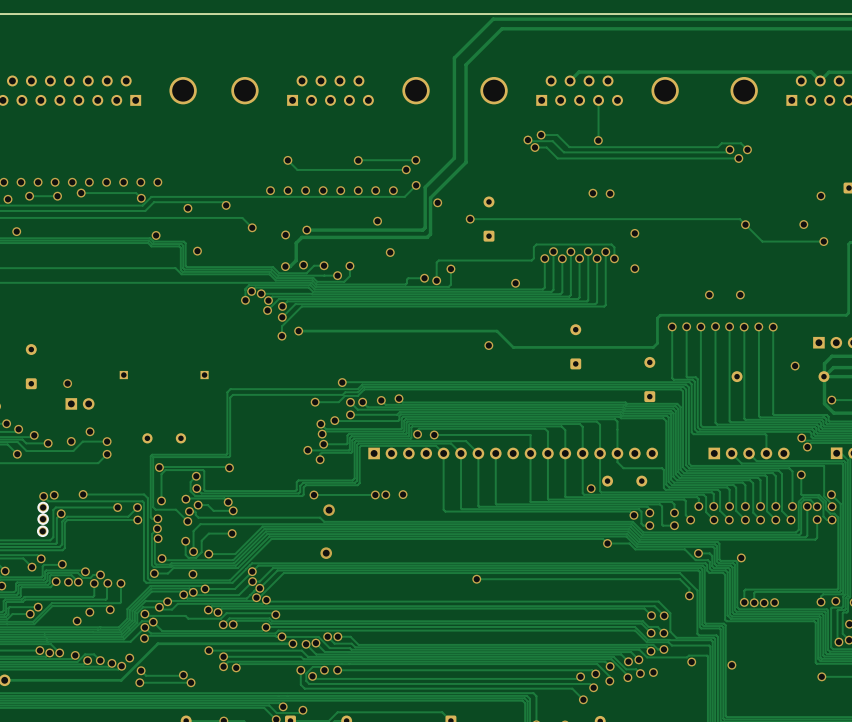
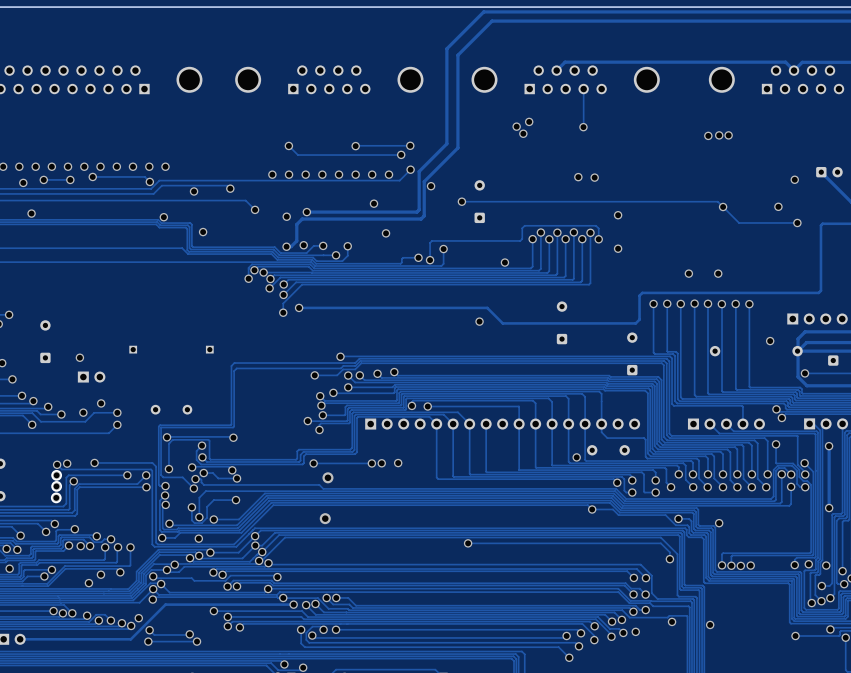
track: (541, 135) (557, 135) (569, 147) (717, 147) (721, 143) (741, 143) (747, 149) -> none
track: (527, 140) (552, 141) (563, 152) (727, 152) (729, 149) -> none
track: (534, 147) (546, 147) (557, 158) (738, 158) -> none
via: none -> (719, 135)
via: (747, 149) -> none
via: none -> (728, 135)
via: (738, 158) -> none

